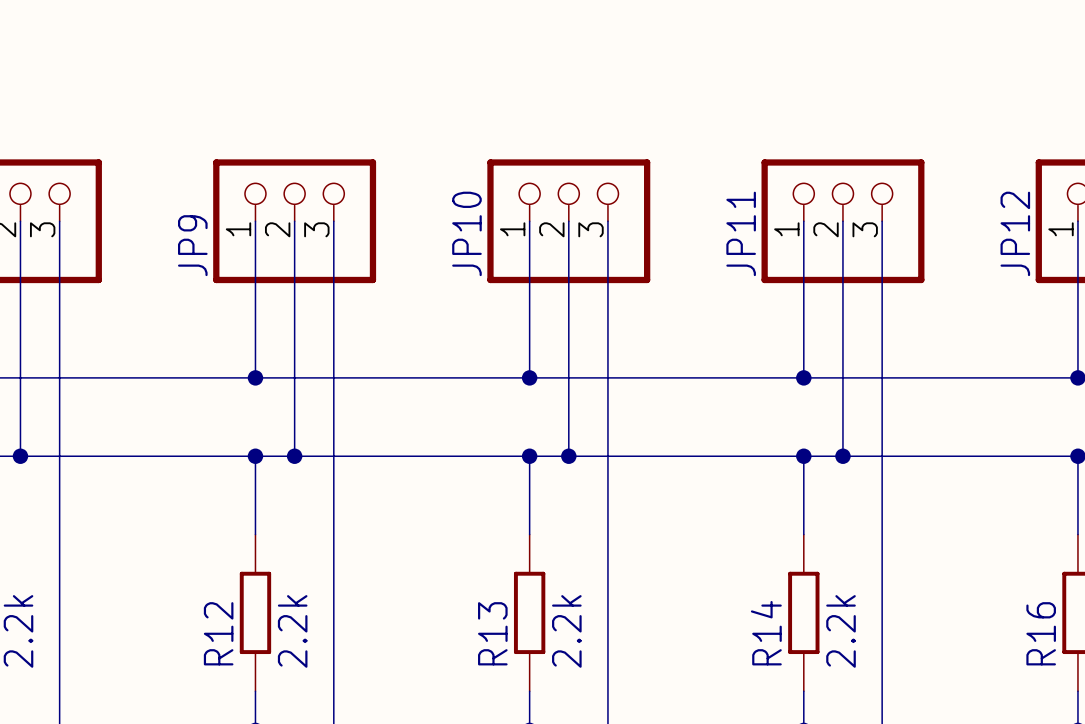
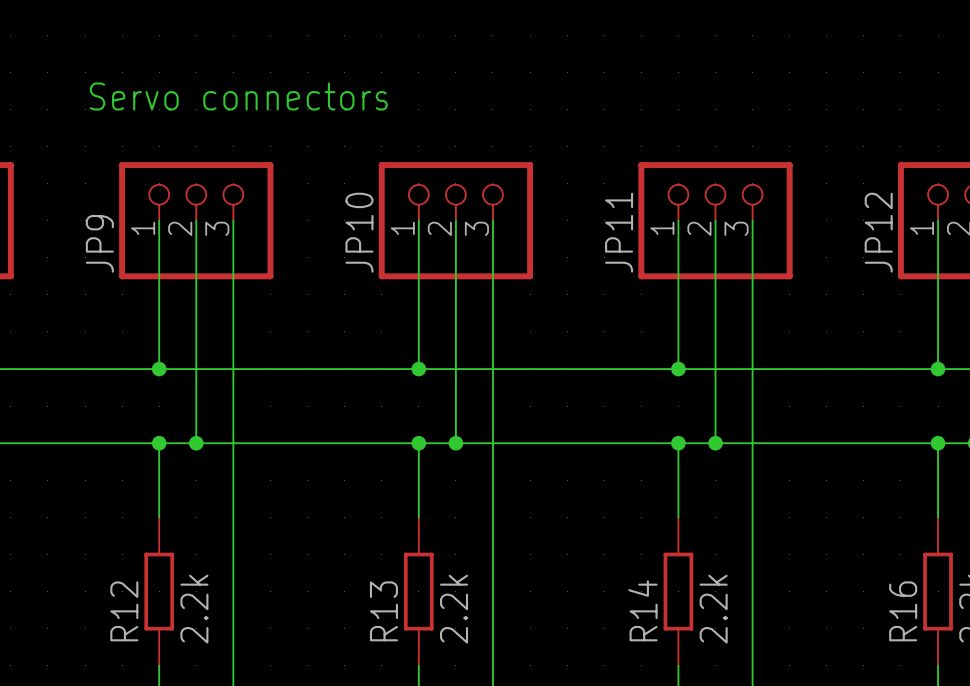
text: none -> Servo connectors (238, 96)

